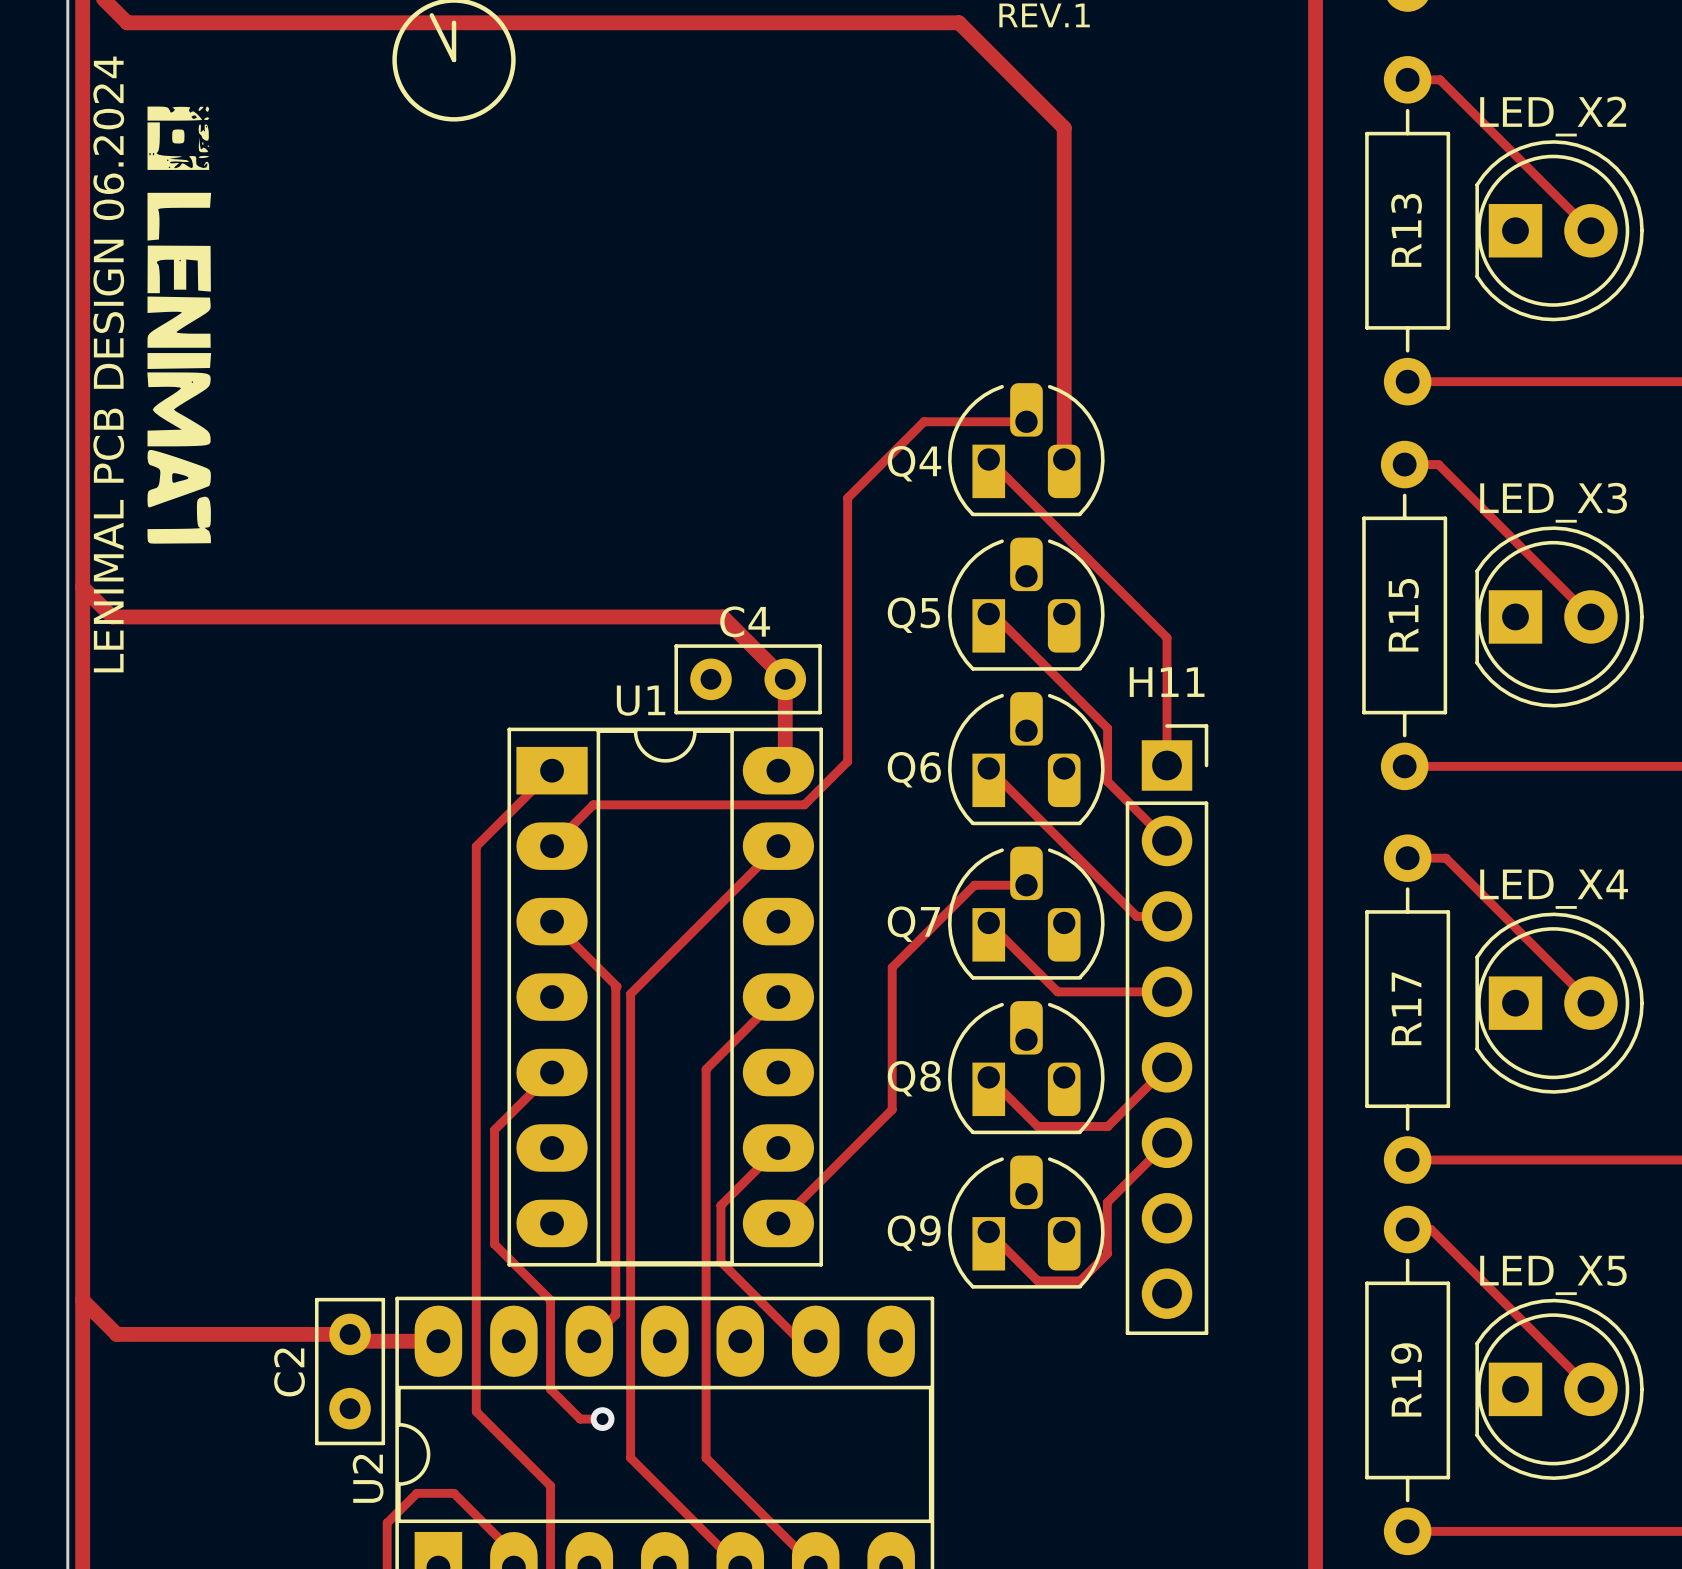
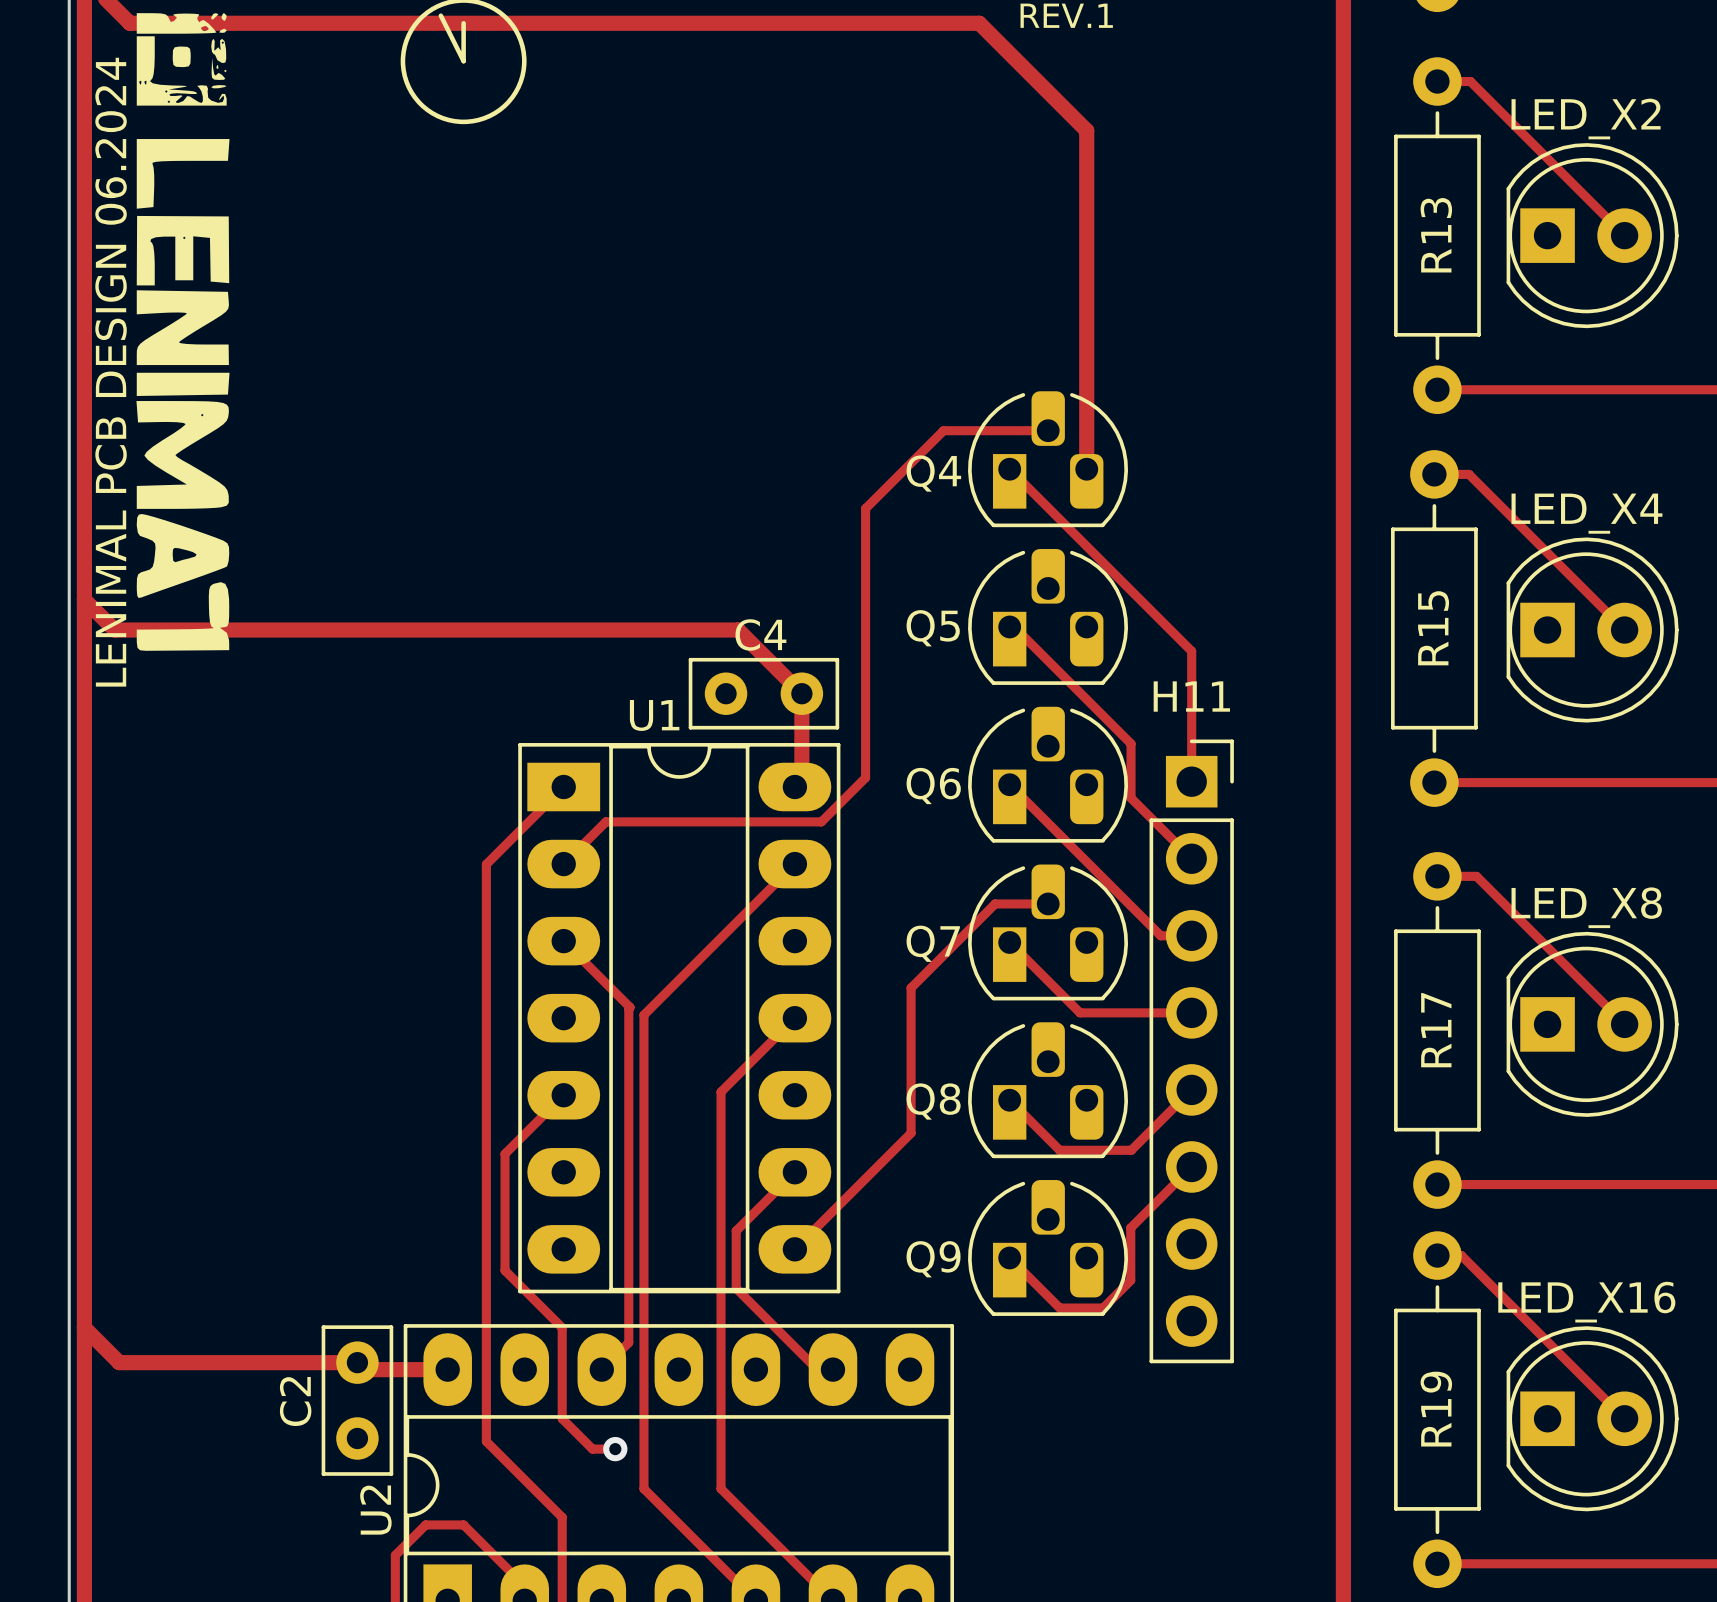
drawing shape: [147, 106, 212, 544] -> [136, 13, 230, 651]
LED_X3 name: LED_X3 (1553, 502) -> LED_X4 (1586, 513)
LED_X4 name: LED_X4 (1554, 889) -> LED_X8 (1586, 907)
LED_X5 name: LED_X5 (1553, 1275) -> LED_X16 (1586, 1302)

